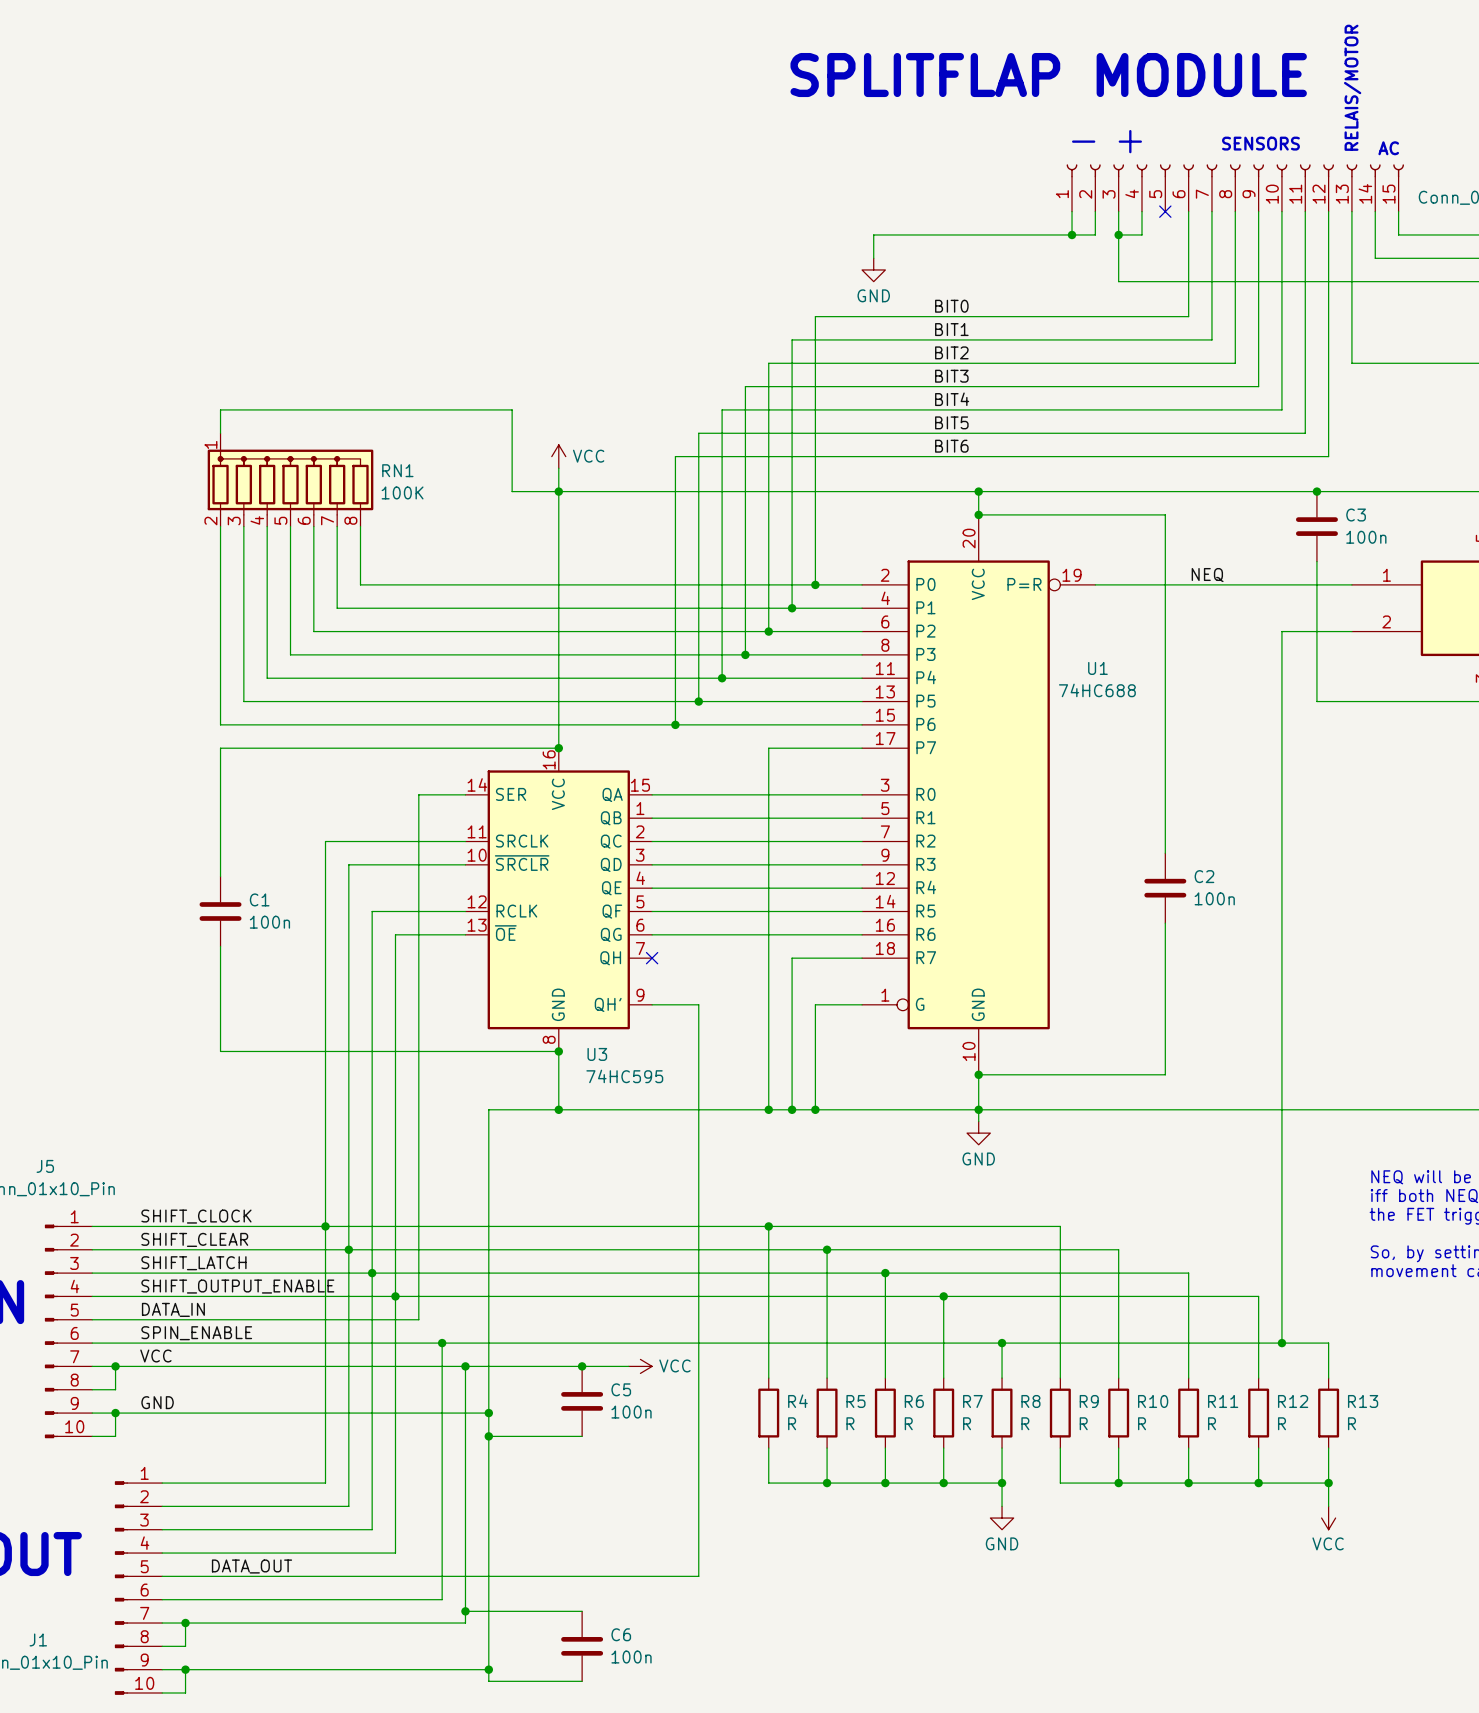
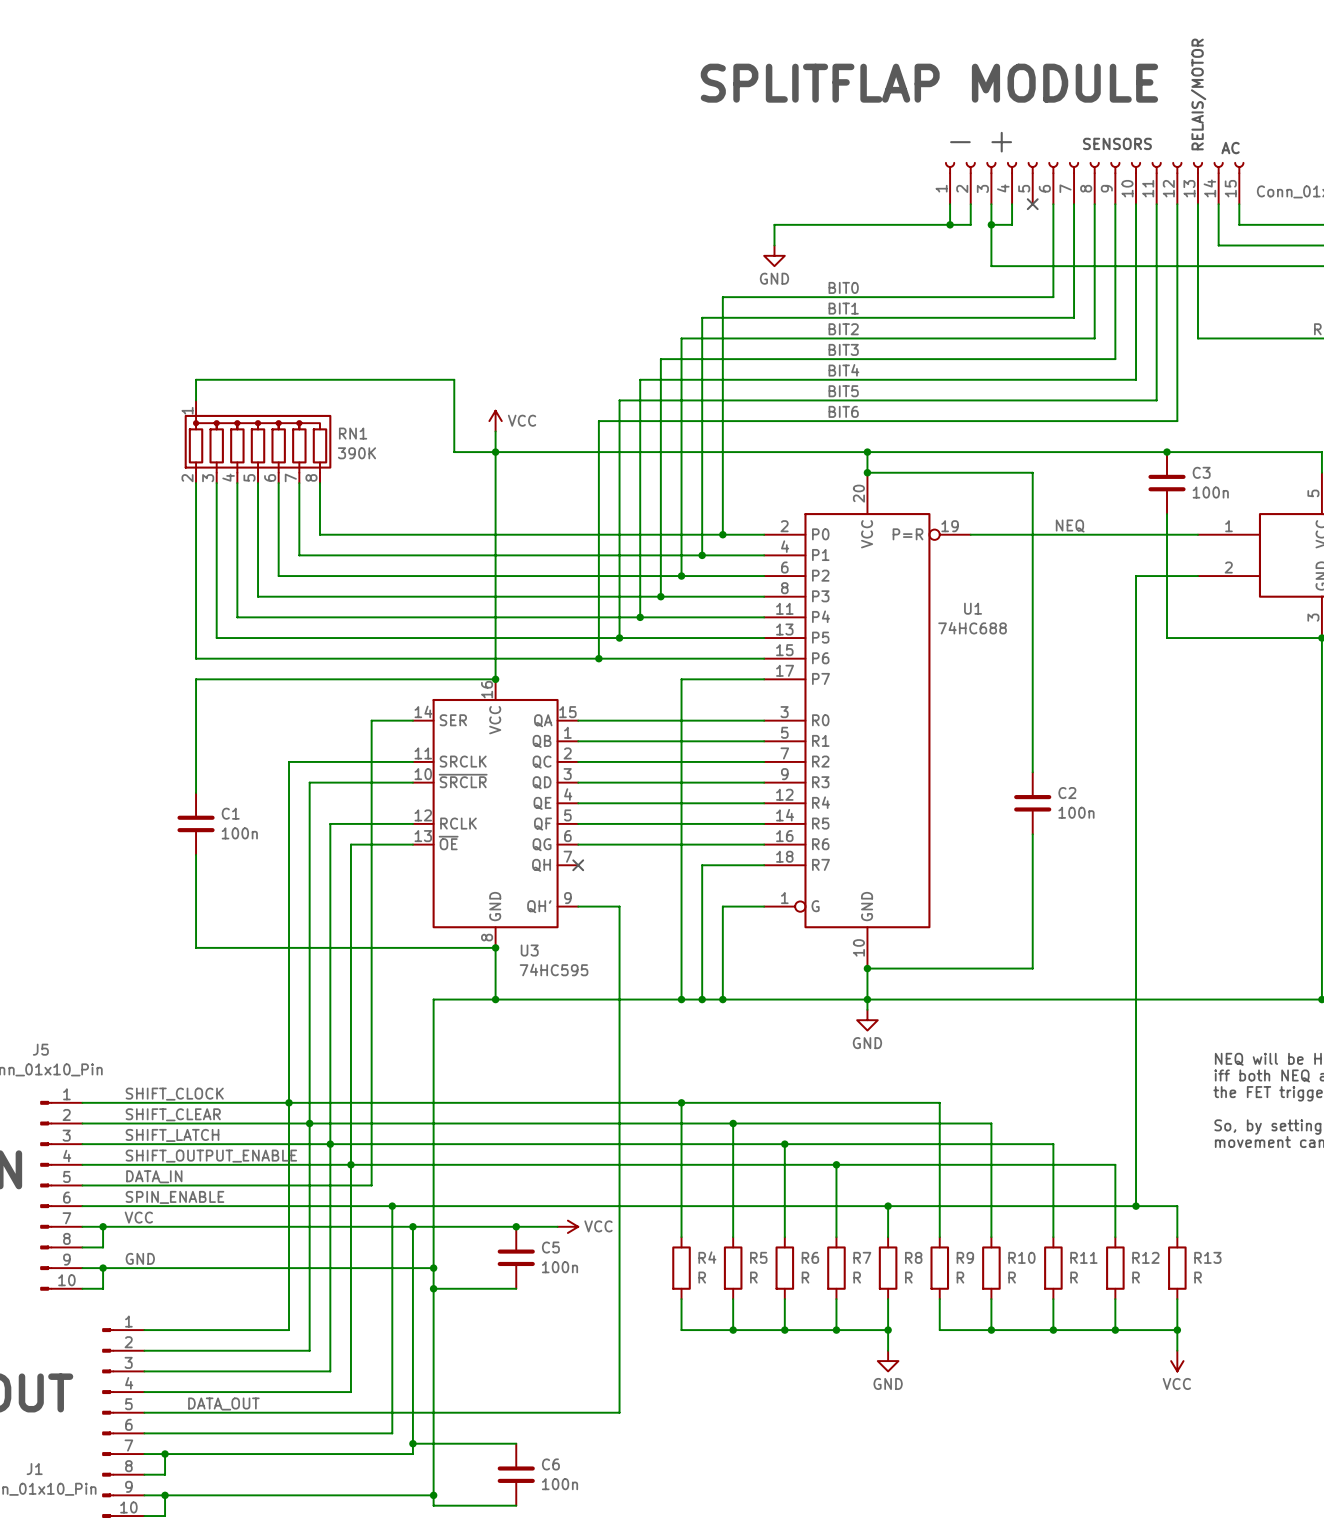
RN1 value: 100K (402, 492) -> 390K (357, 453)

